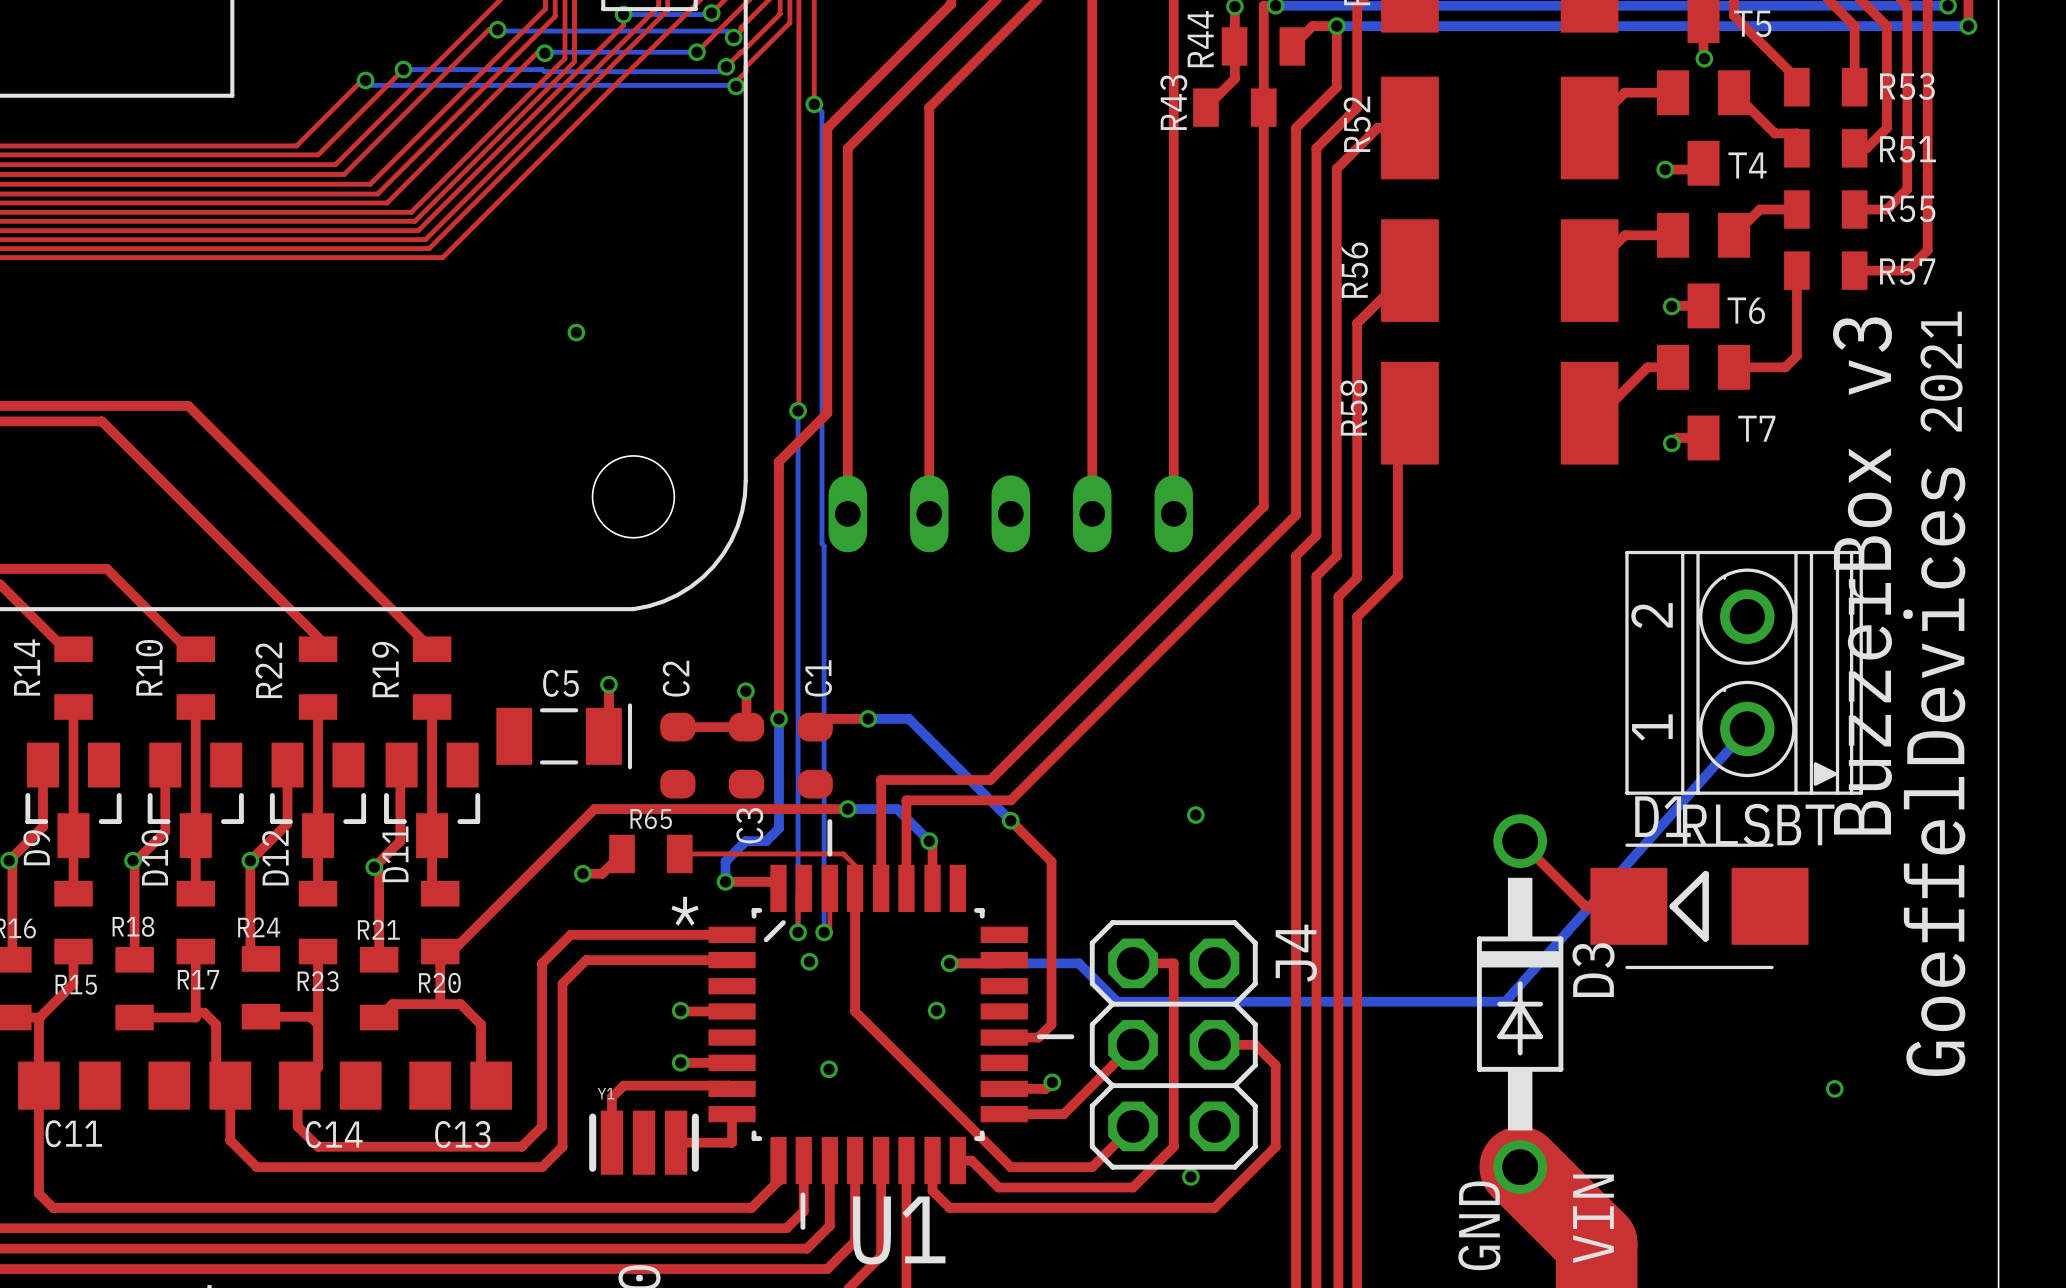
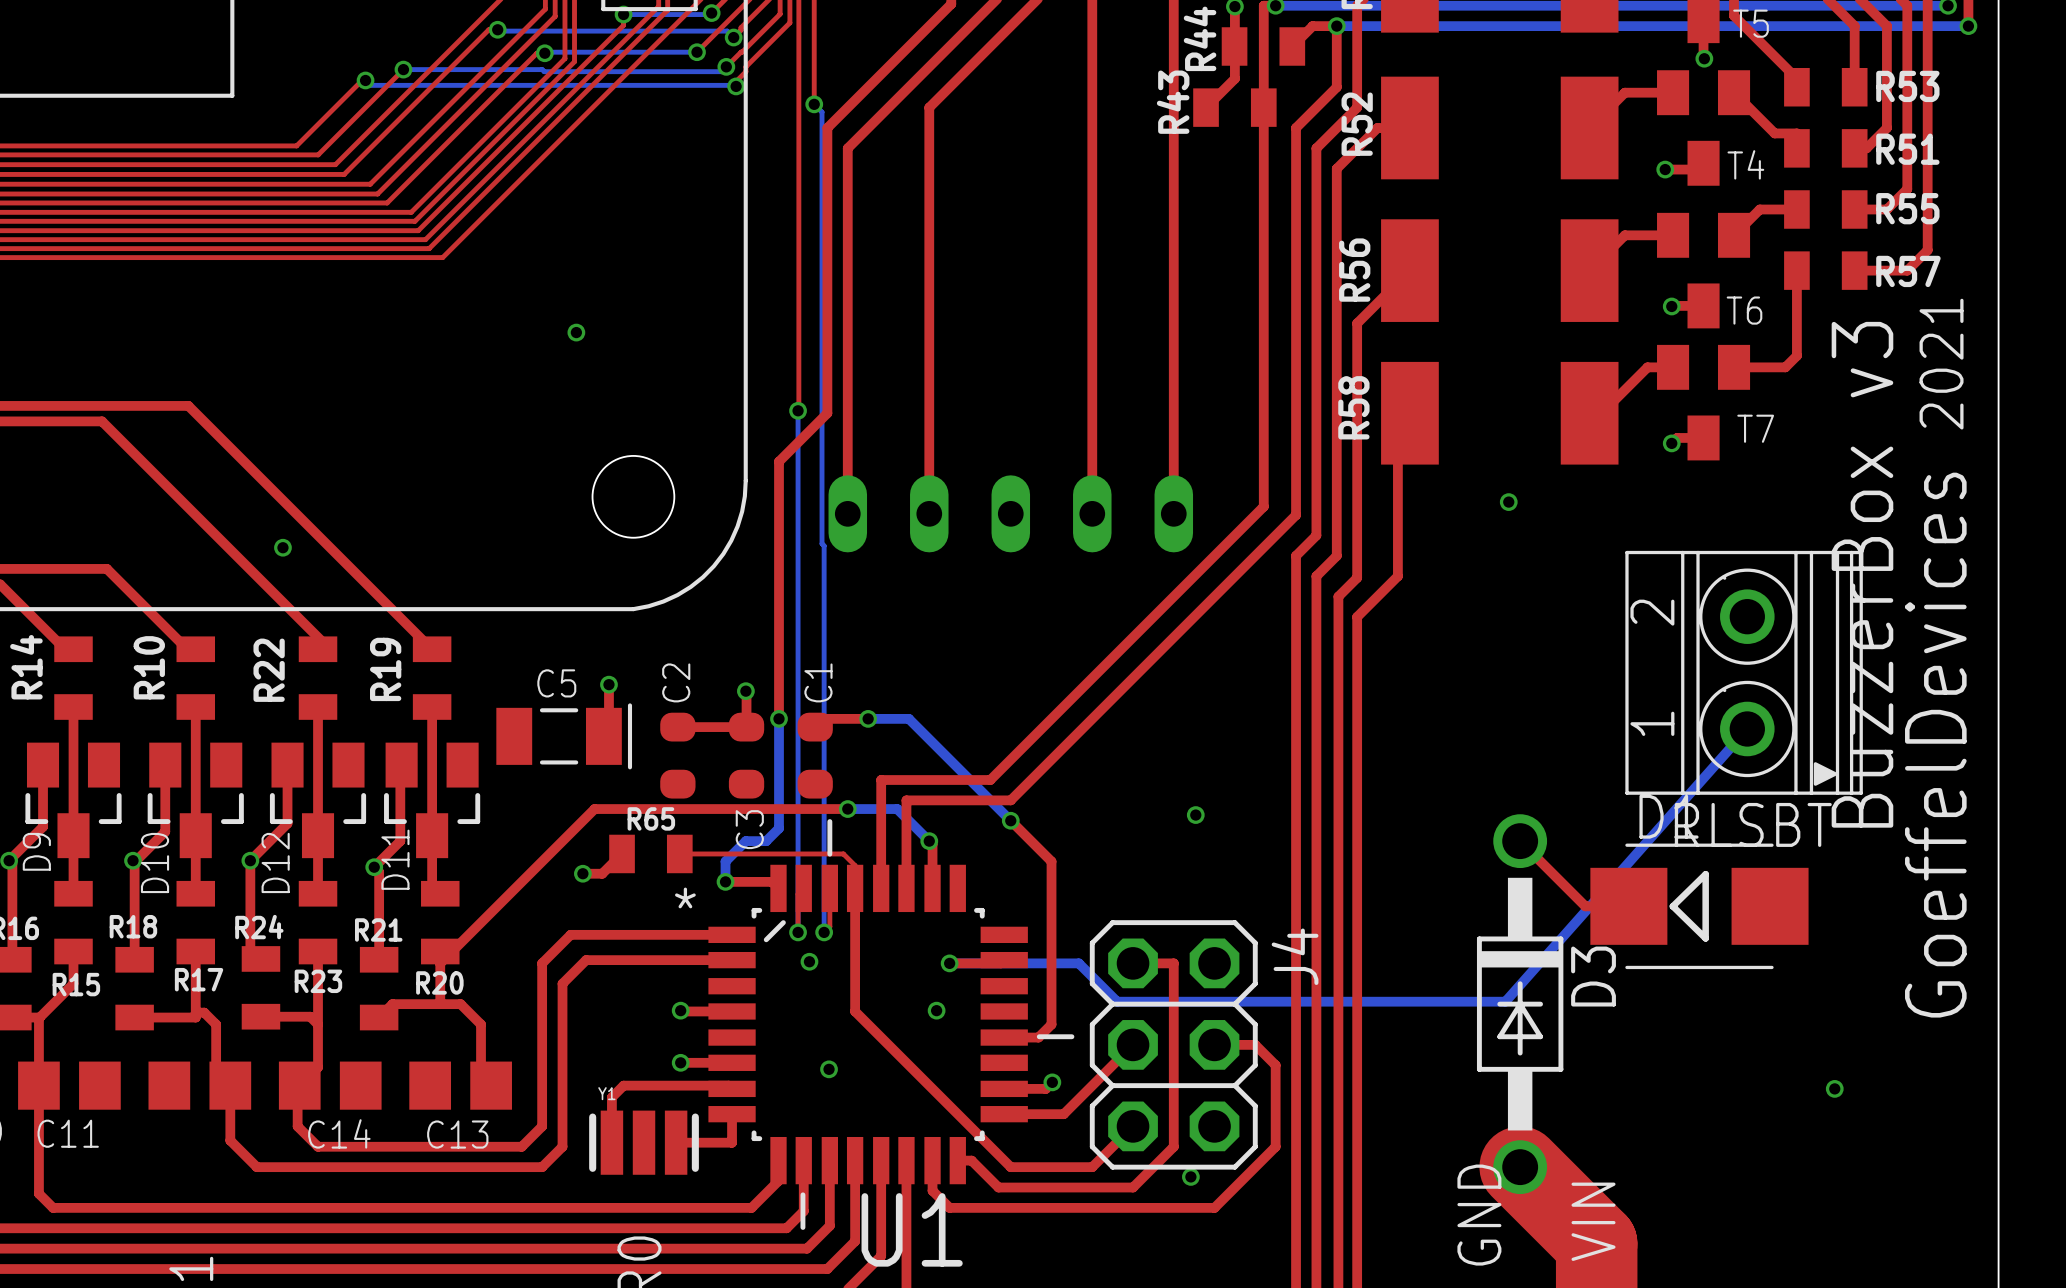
via: none -> (1508, 502)
via: none -> (282, 547)

